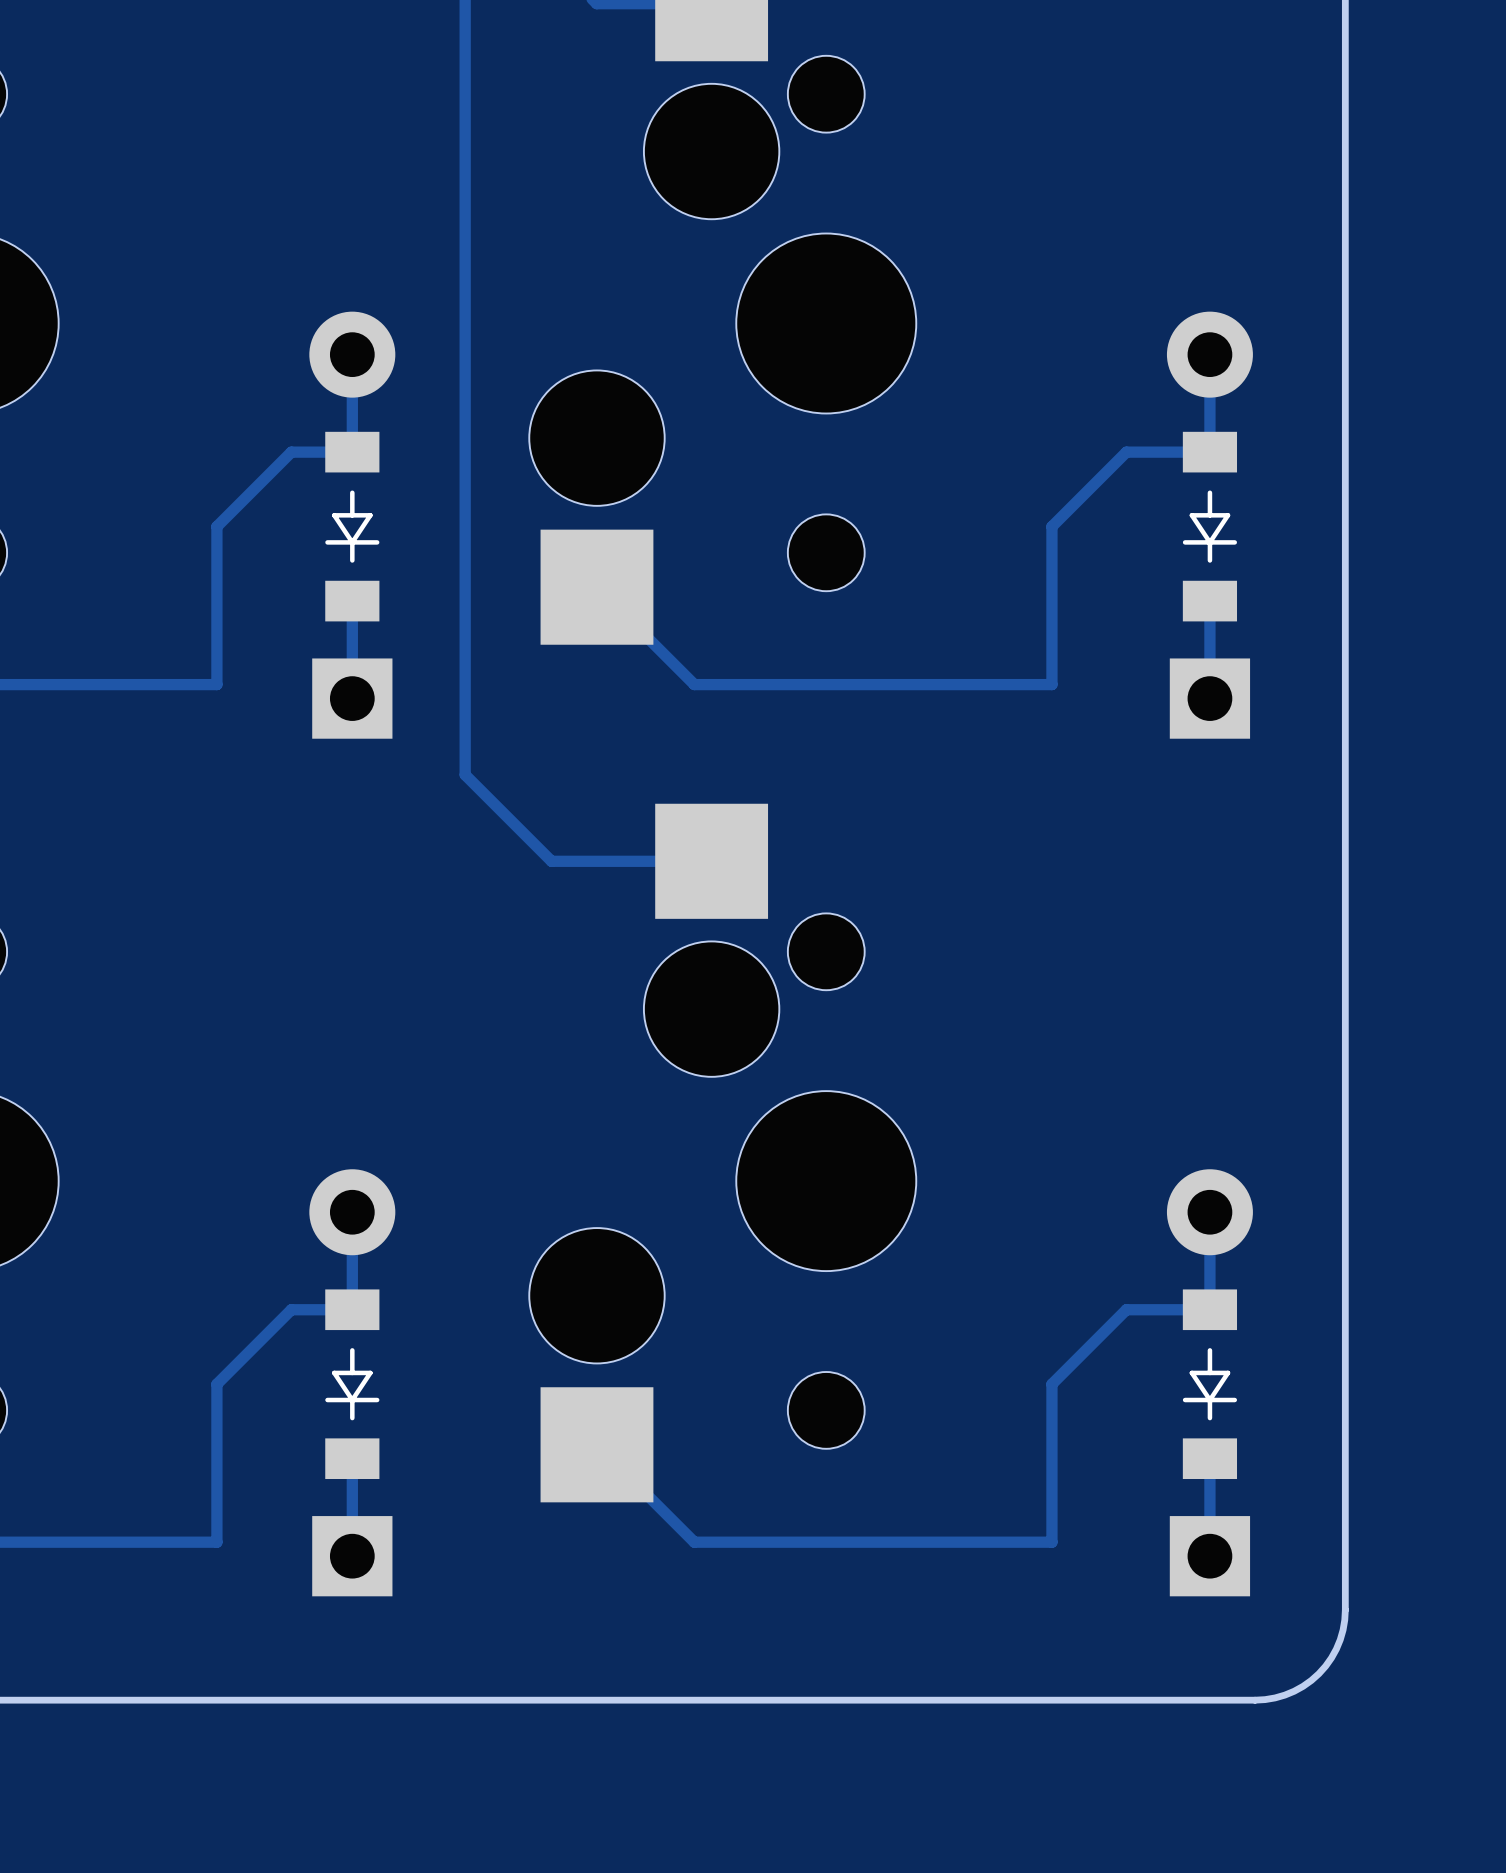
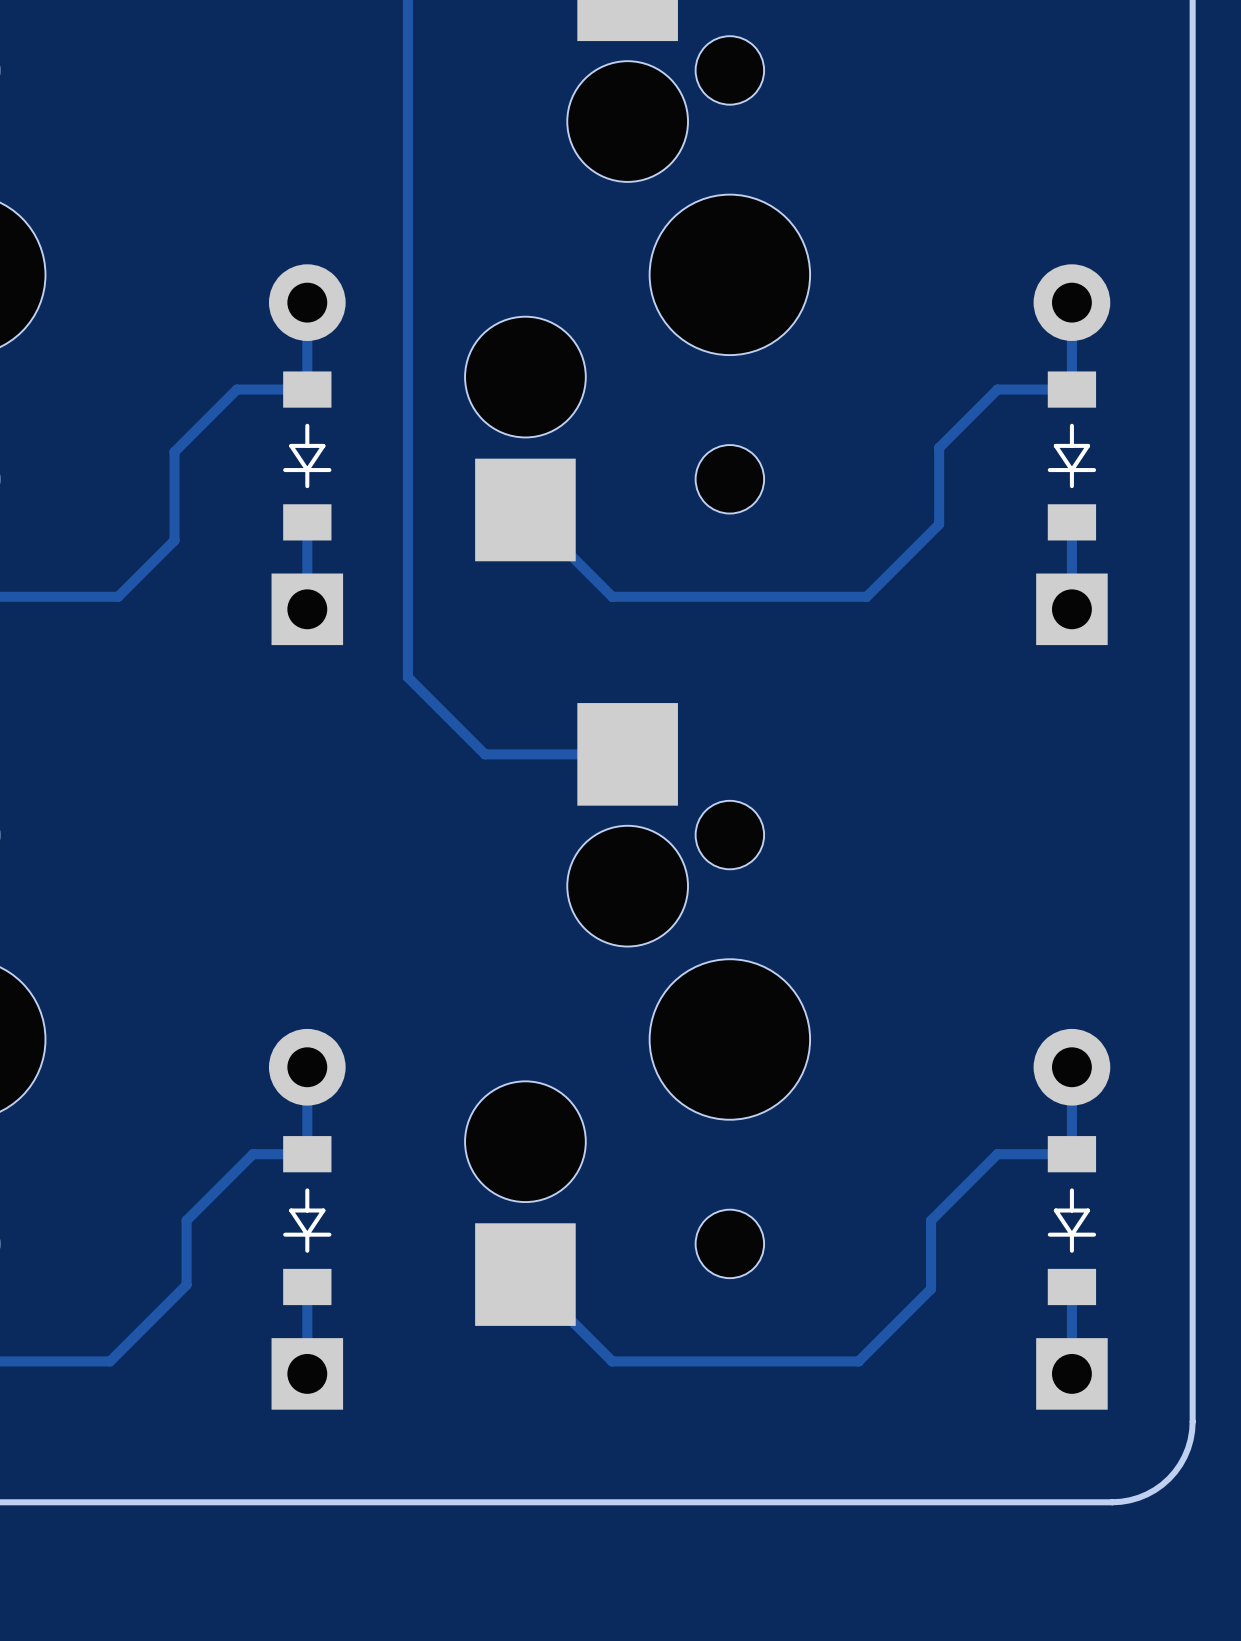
track: (291, 452) (216, 526) (216, 684) (140, 684) -> (252, 389) (236, 389) (174, 451) (174, 540) (118, 596)
track: (1060, 517) (1051, 526) (1051, 684) (979, 684) -> (939, 447) (939, 524) (866, 596)
track: (216, 1456) (216, 1542) (131, 1542) -> (186, 1284) (110, 1361)
track: (1051, 1460) (1051, 1542) (970, 1542) -> (931, 1288) (858, 1361)

